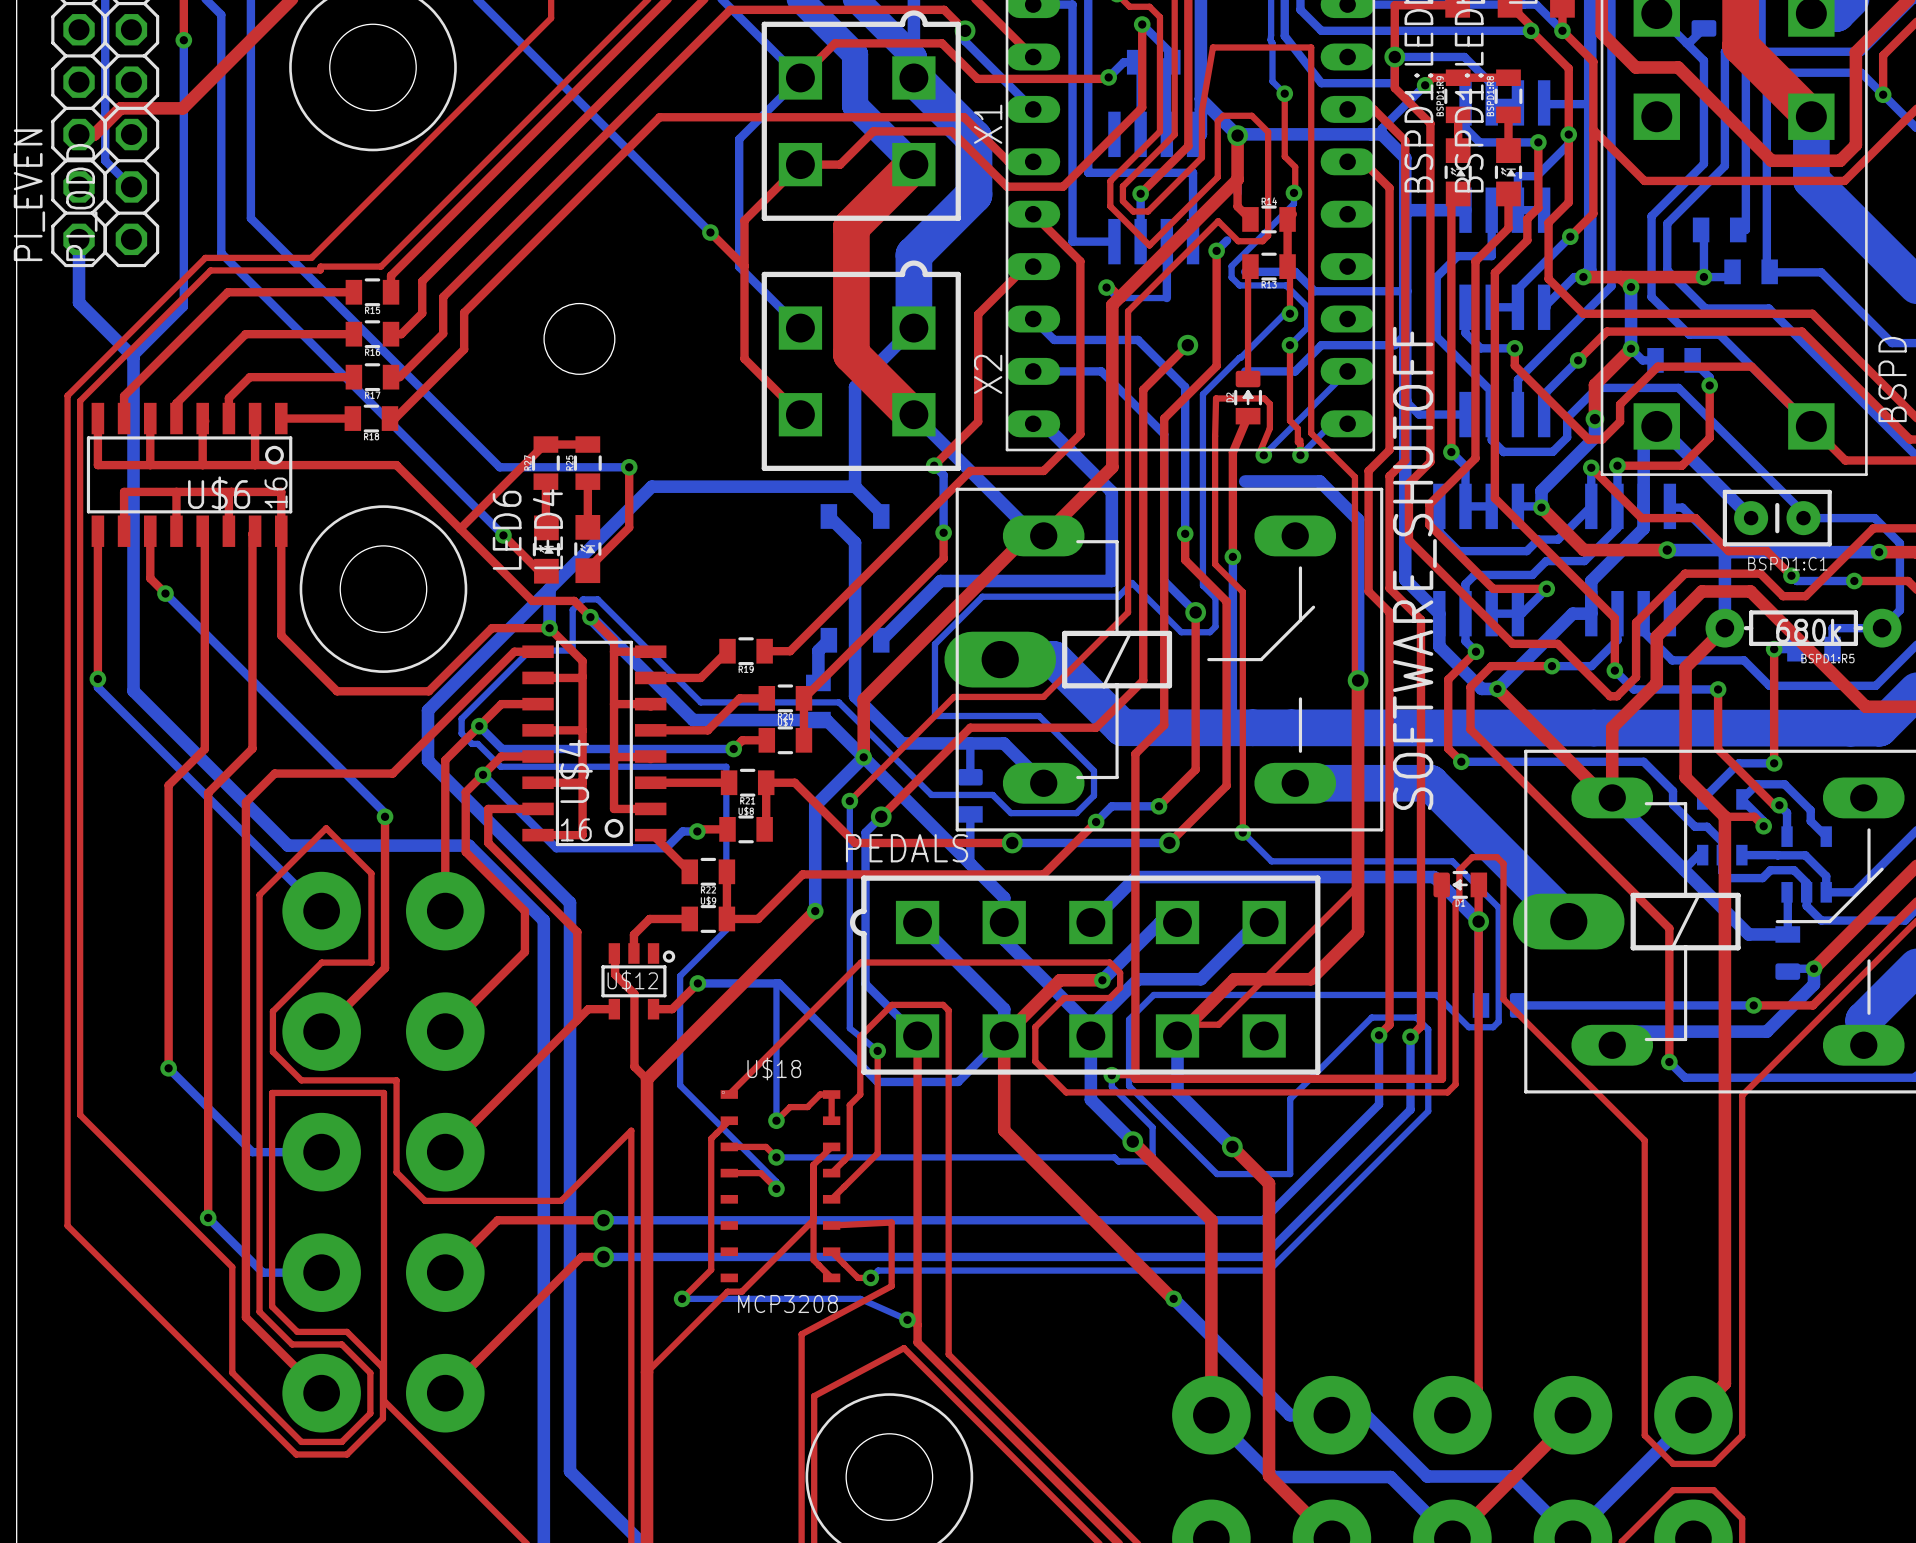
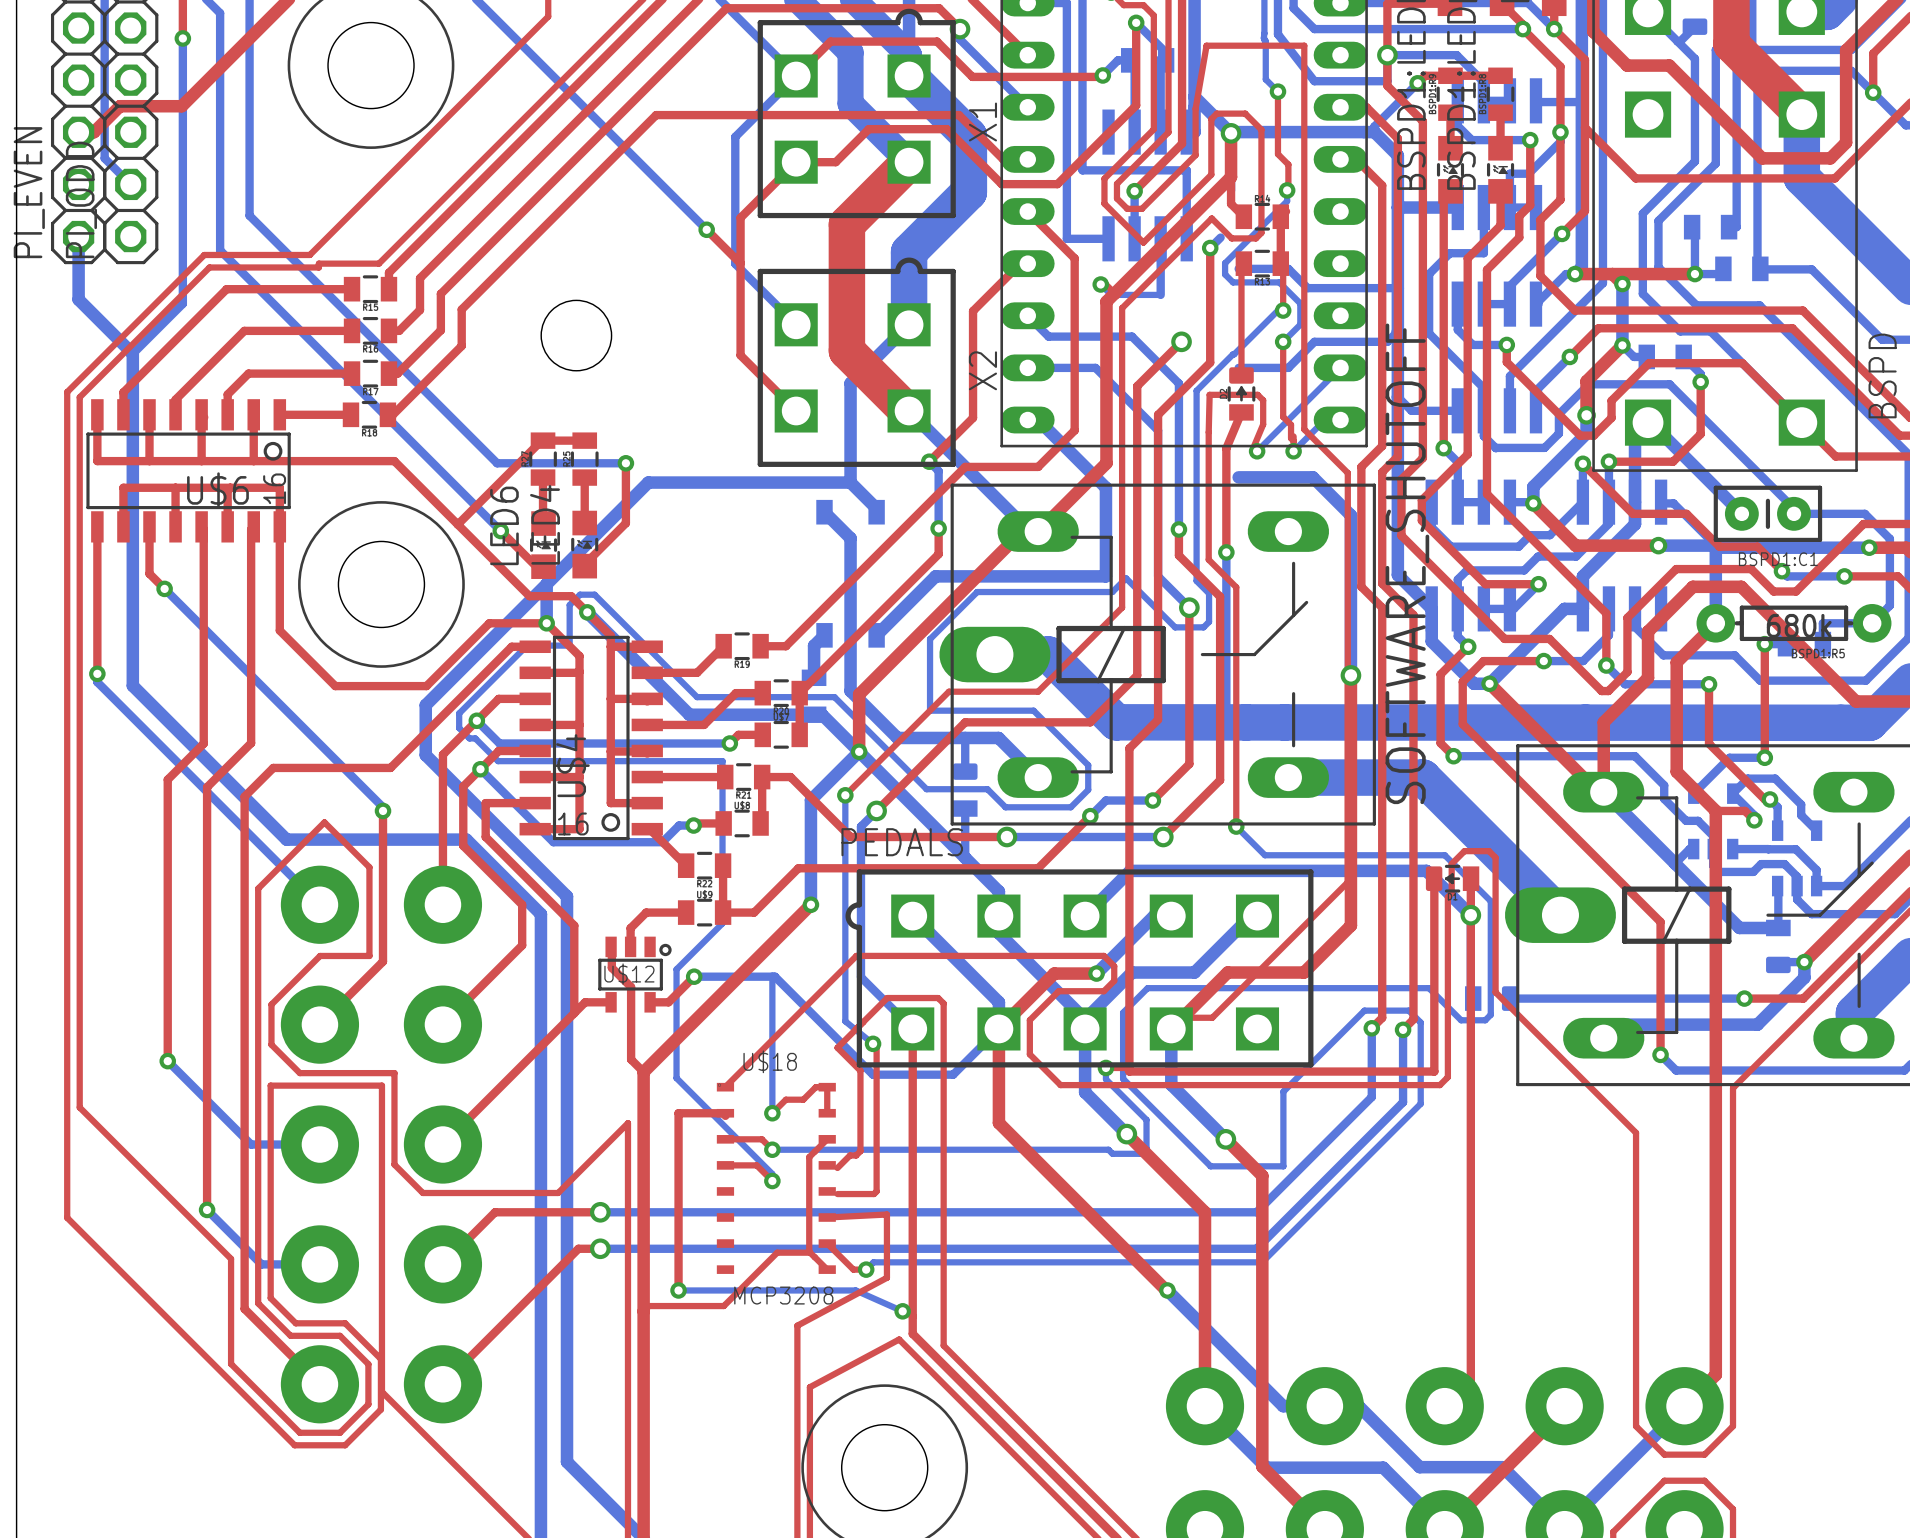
top track: (860, 1036) (860, 1094) (849, 1105) (849, 1155) (831, 1173) -> (855, 1029) (837, 1047) (860, 1070) (860, 1151) (856, 1155) (850, 1155) (837, 1167)
top track: (877, 1050) (877, 1153) (831, 1199) -> (873, 1043) (876, 1047) (876, 1191) (874, 1194) (837, 1194)
top track: (729, 1120) (711, 1138) (711, 1269) (682, 1298) -> (725, 1115) (725, 1113) (678, 1113) (678, 1290)
top track: (813, 1220) (741, 1291) (727, 1291) (647, 1372) -> none
top track: none -> (810, 1252) (777, 1252) (723, 1306) (648, 1306) (643, 1311)

